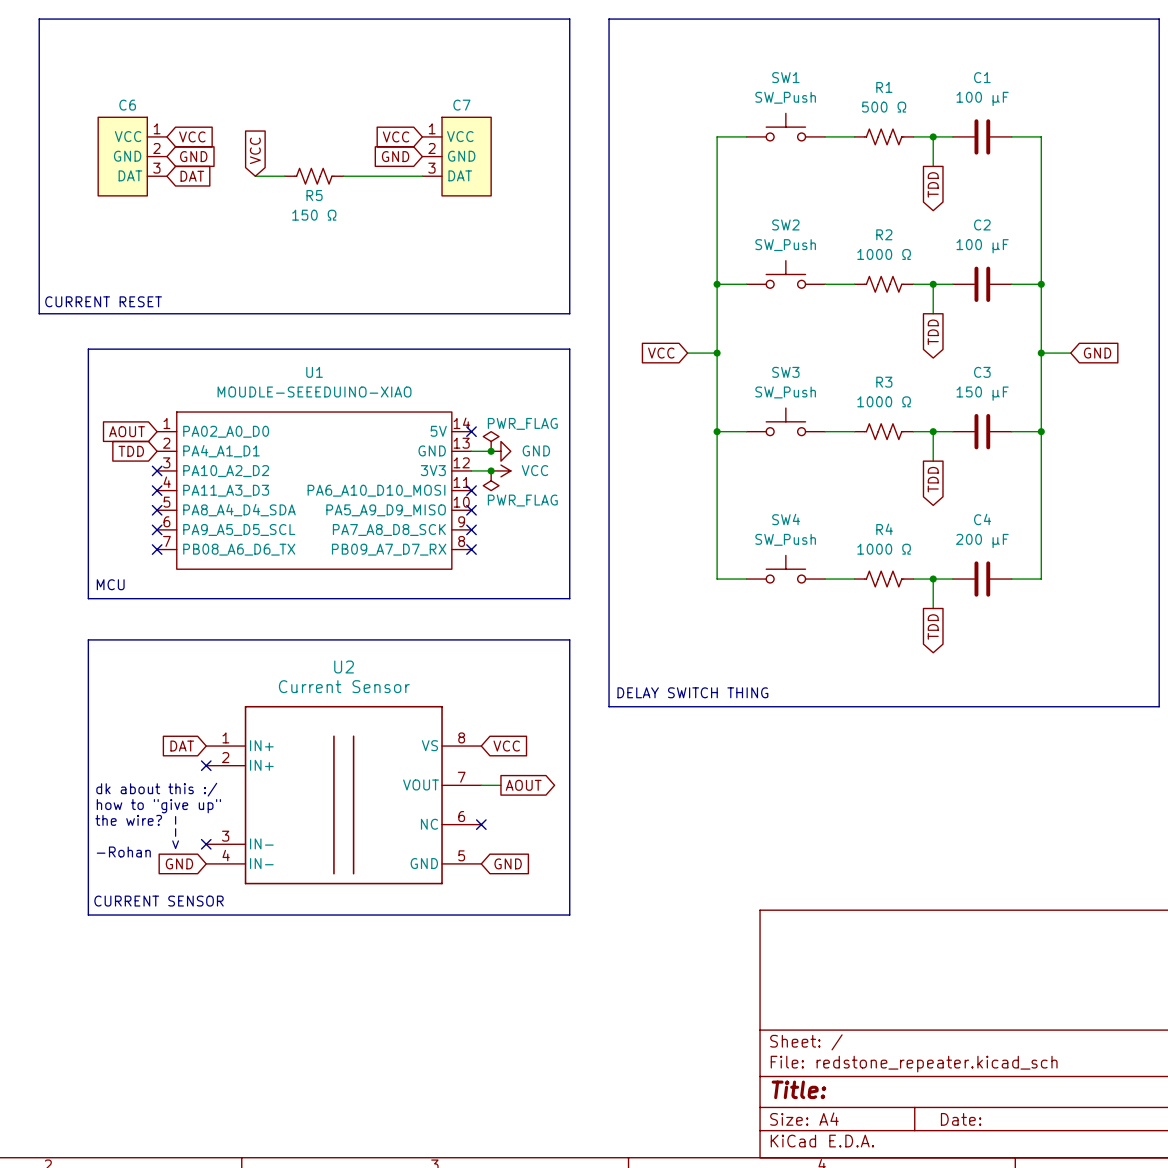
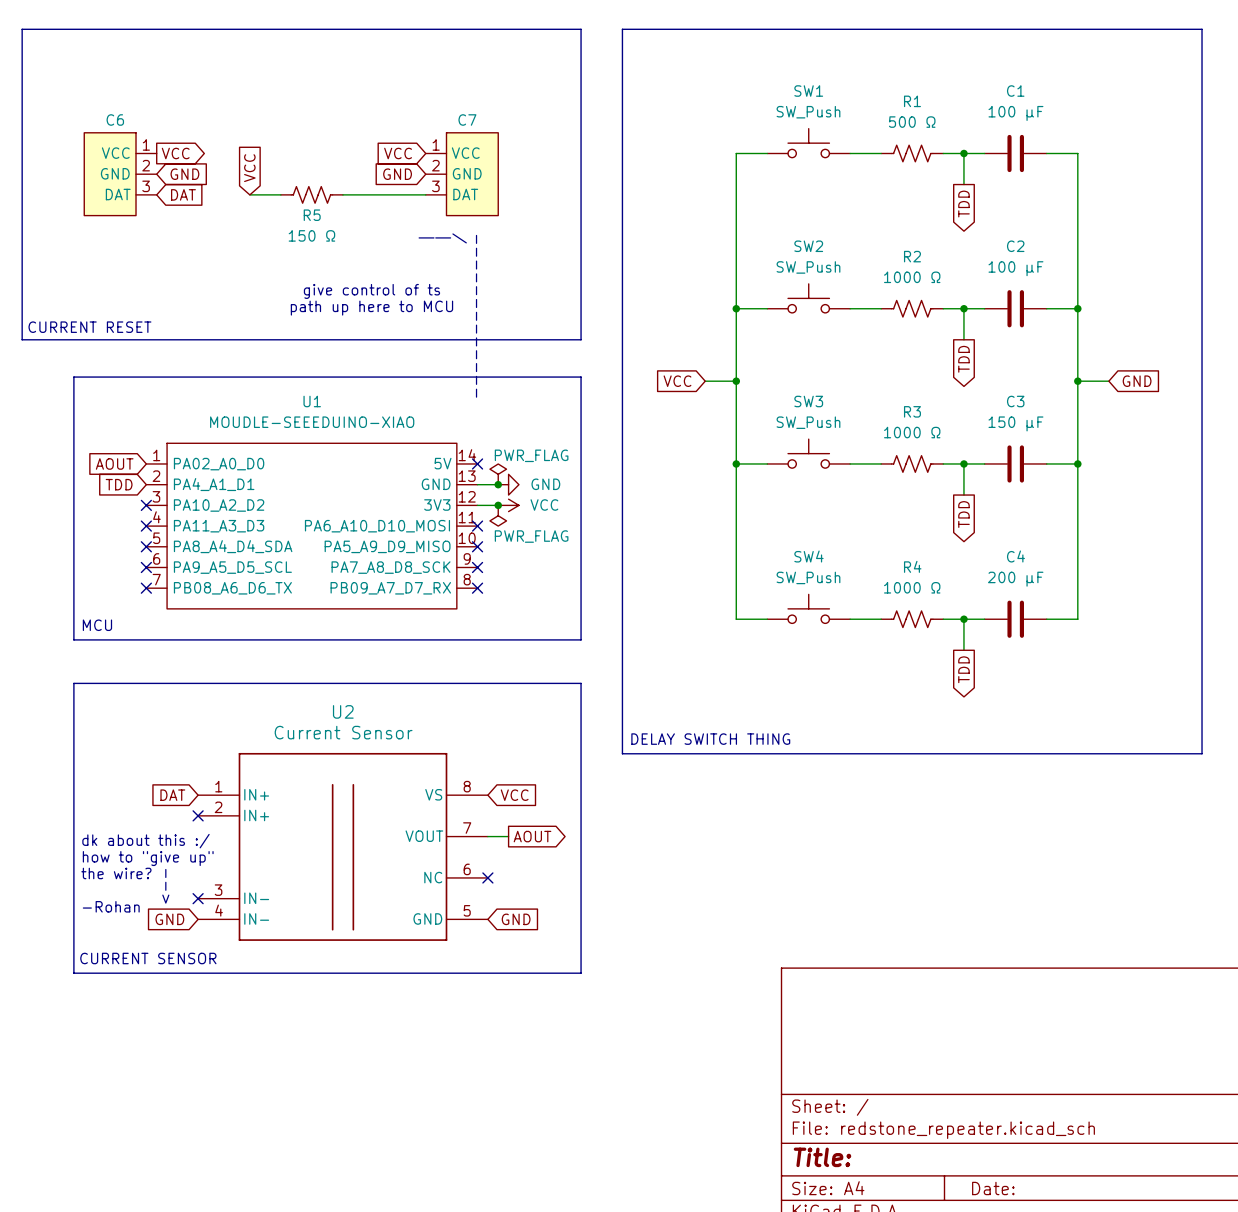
global label shape: input (192, 136) -> output (175, 153)
text: none -> | (426, 237)
text: none -> | (443, 237)
text: none -> / (459, 238)
text: none -> give control of ts (371, 291)
text: none -> path up here to MCU (371, 308)
text: none -> ------------- (476, 316)

